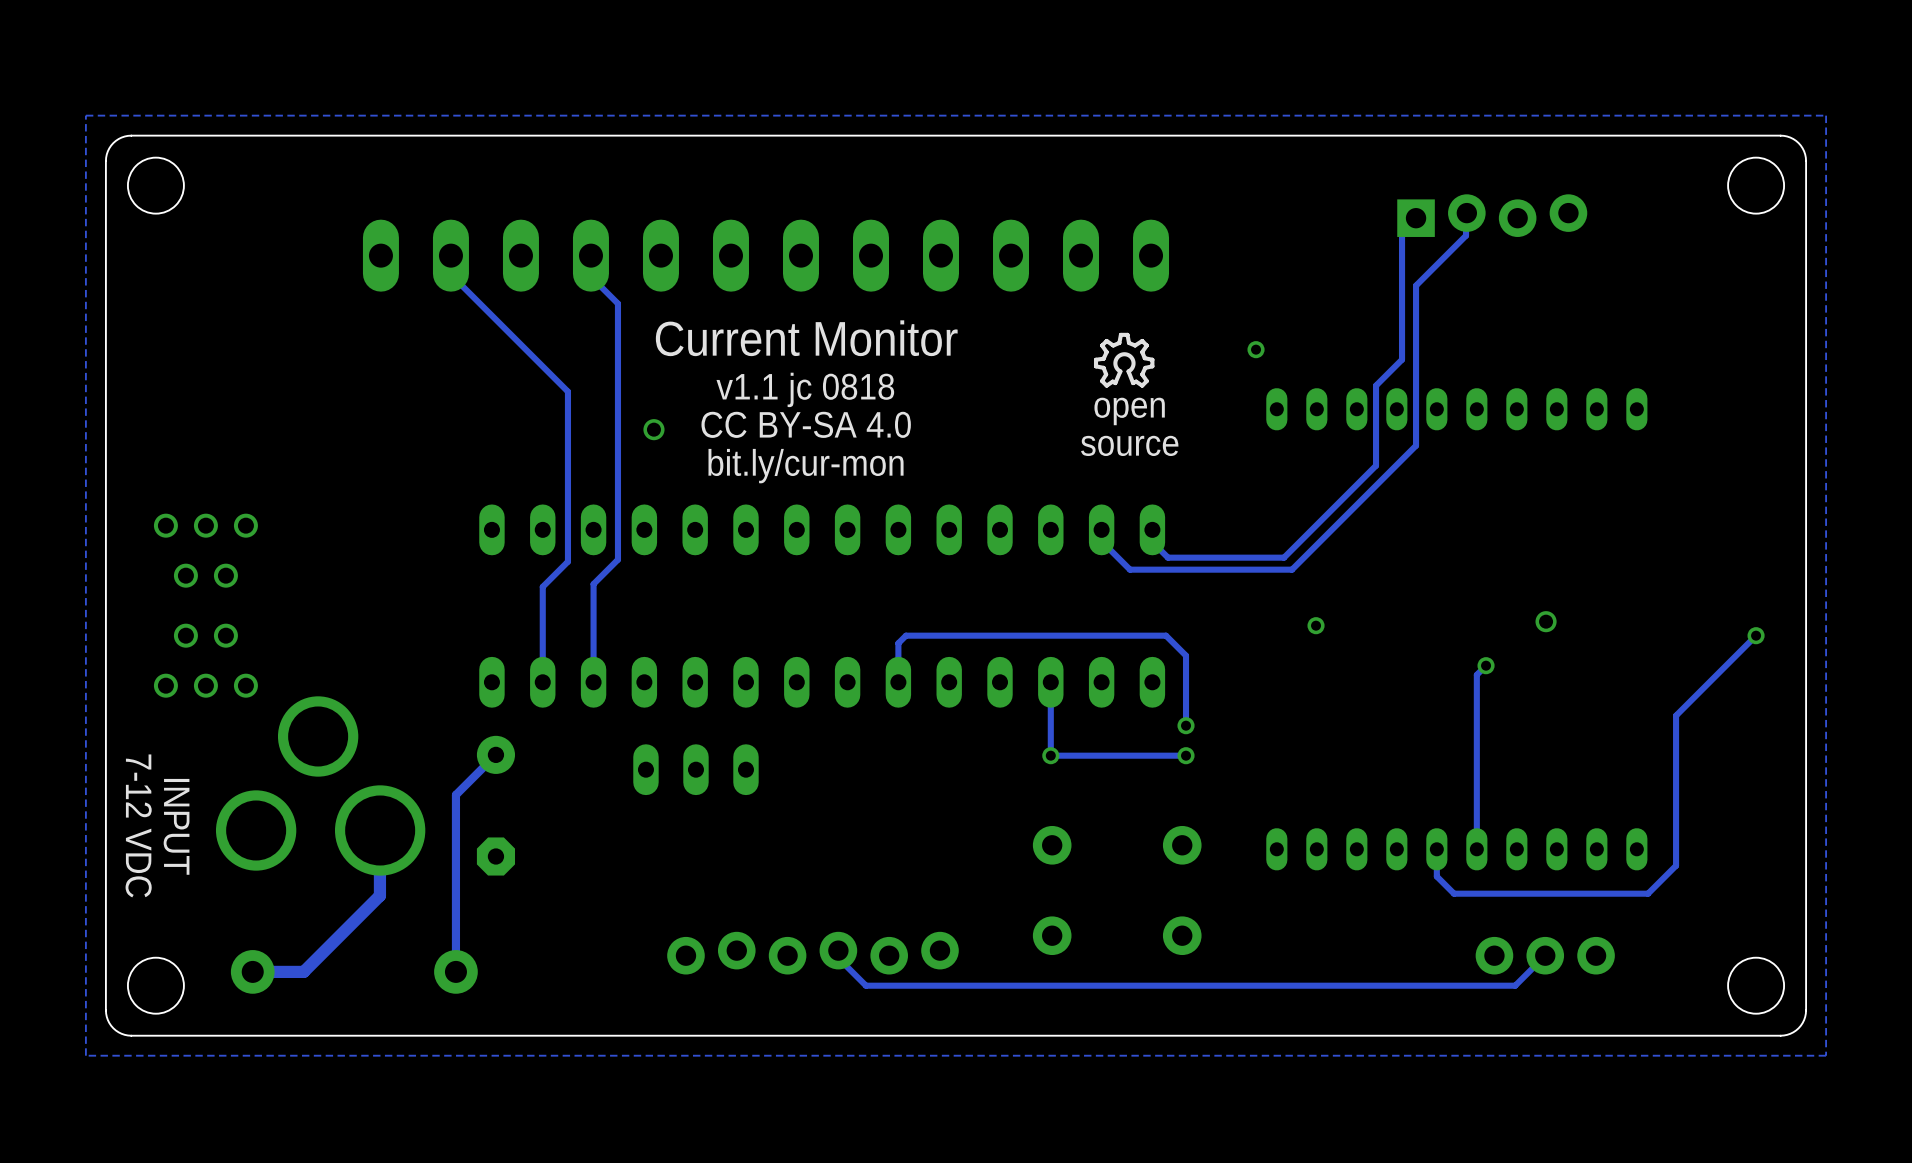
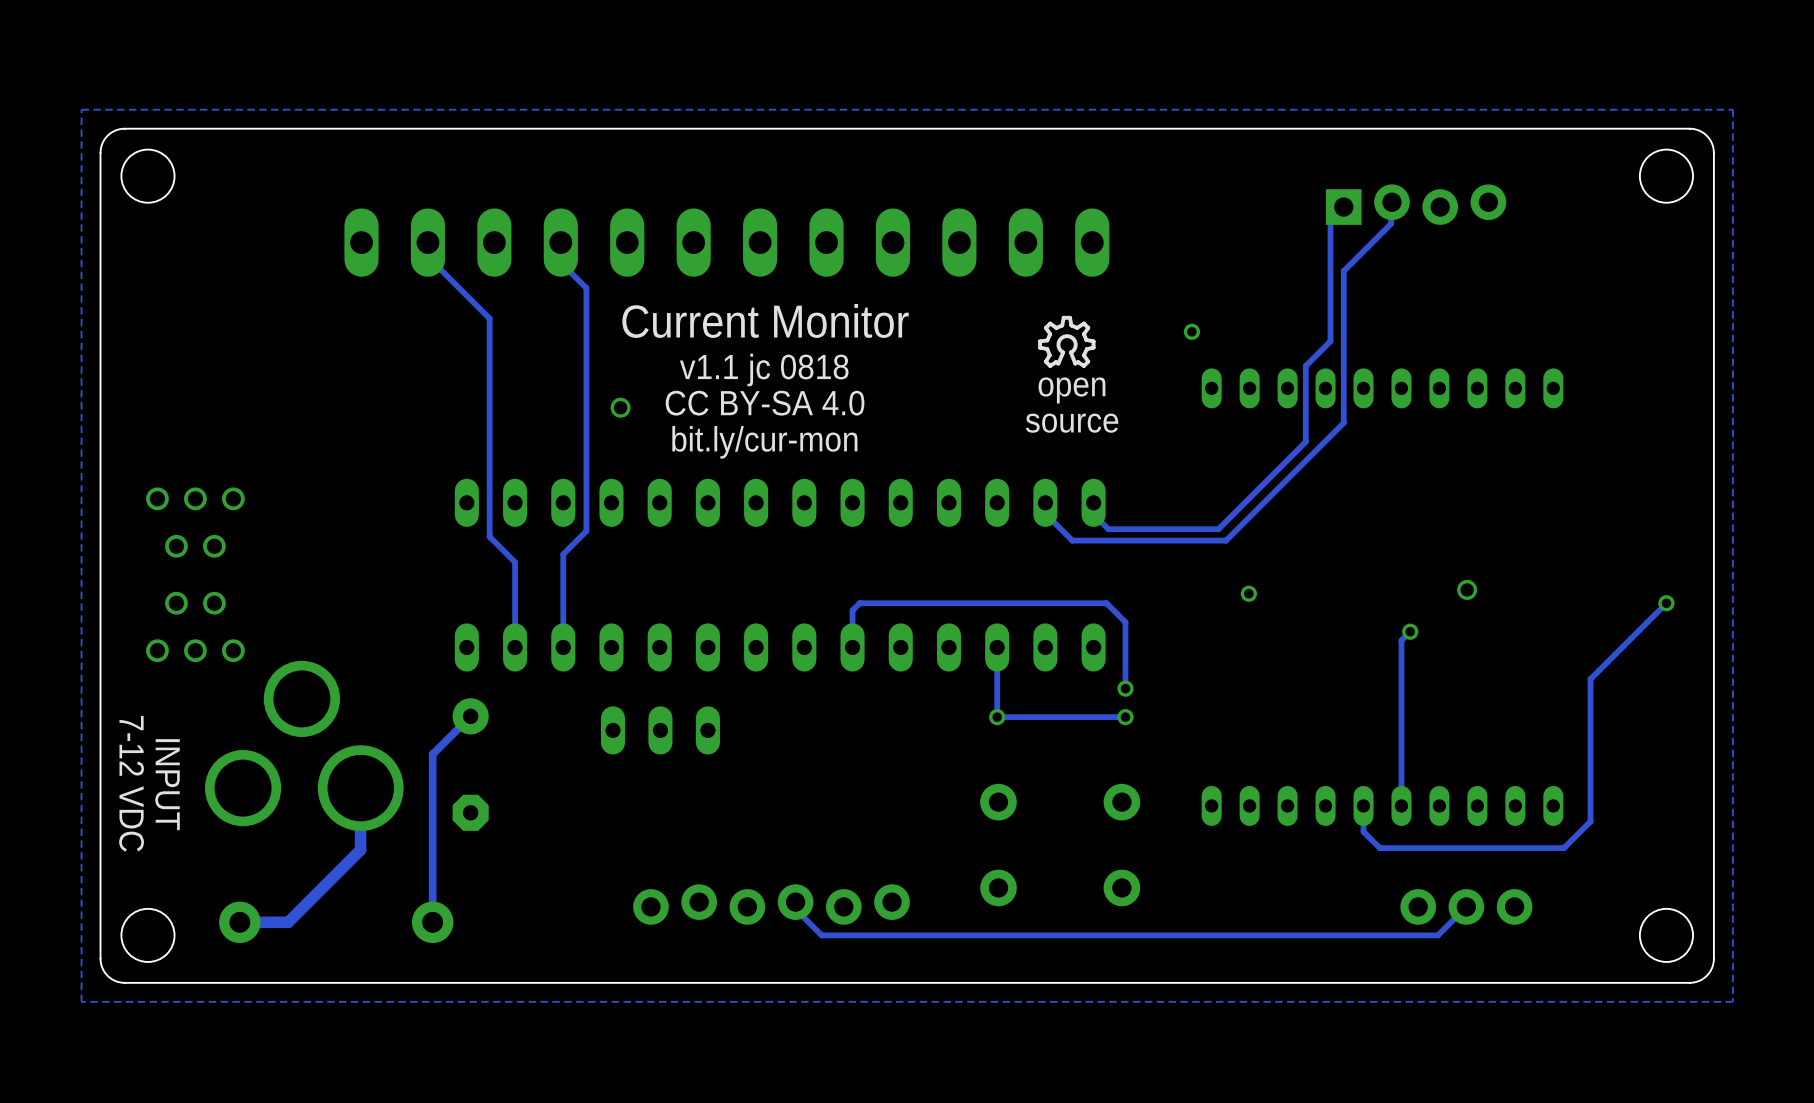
track: (450, 255) (455, 260) (455, 279) (567, 391) (567, 561) (542, 586) (542, 592) -> (427, 242) (423, 247) (423, 252) (489, 318) (489, 536) (515, 562)

